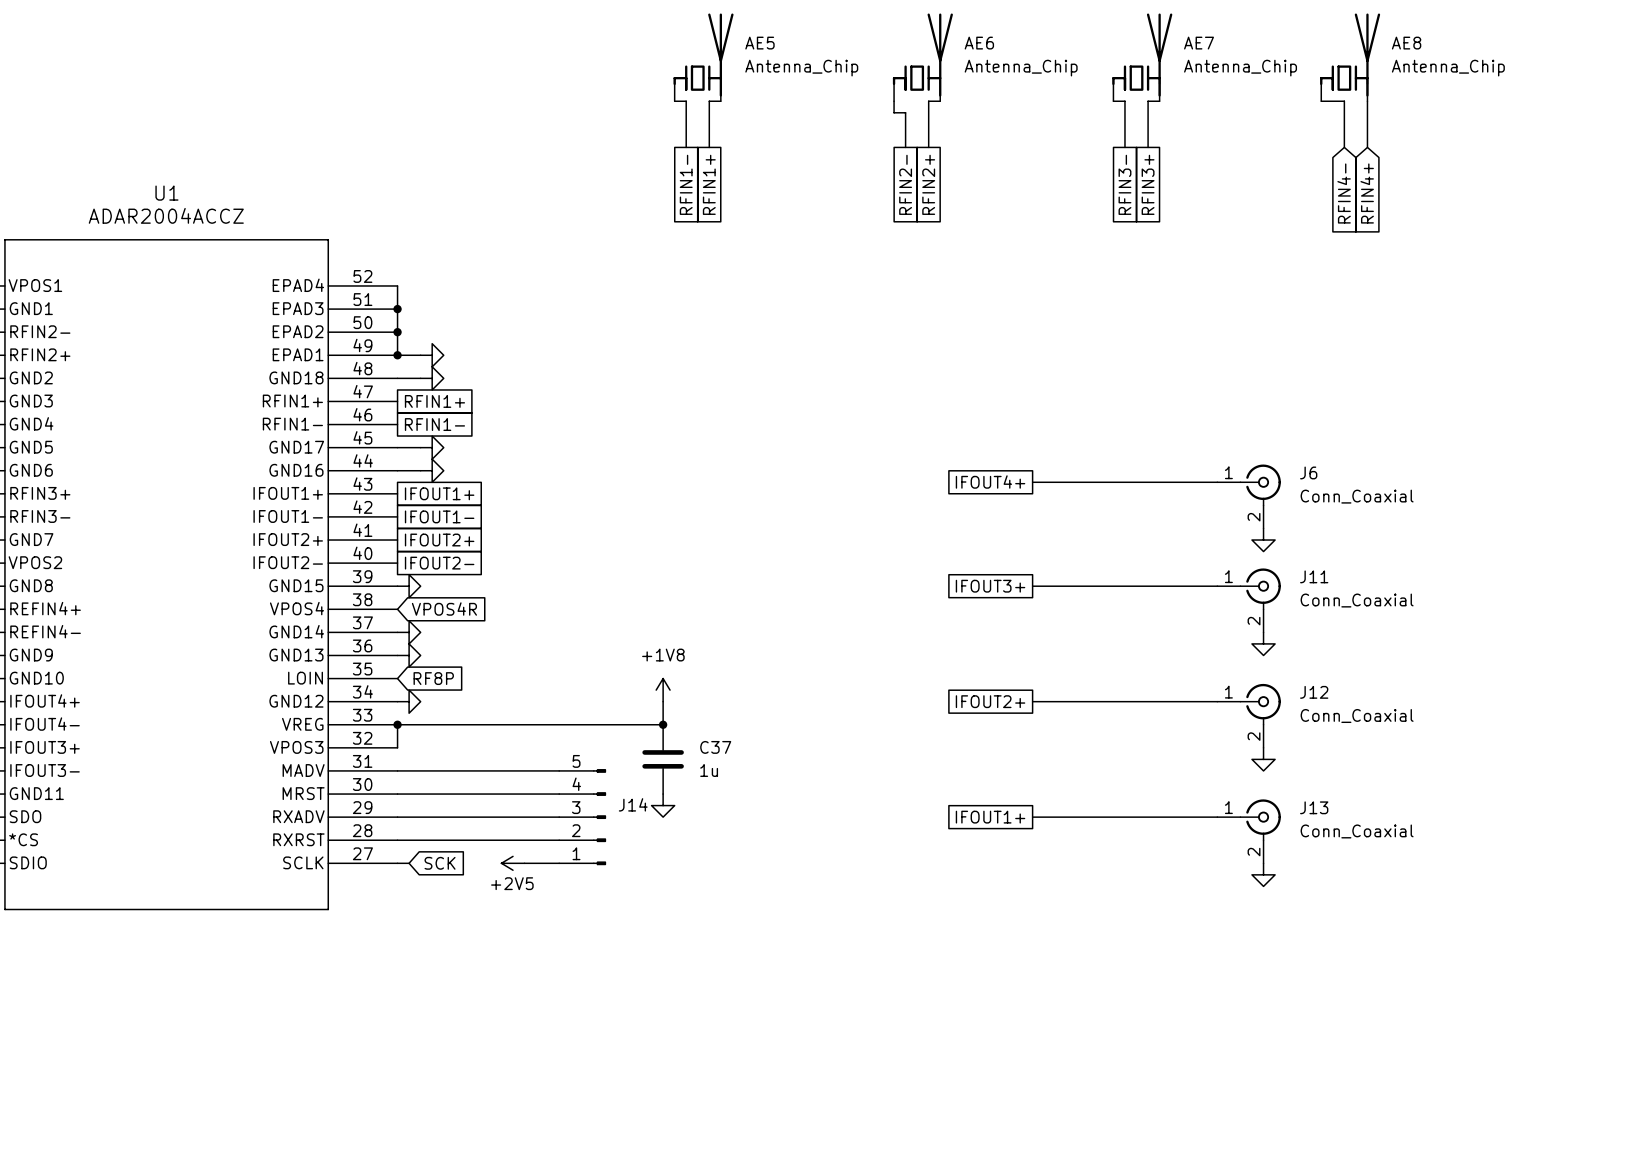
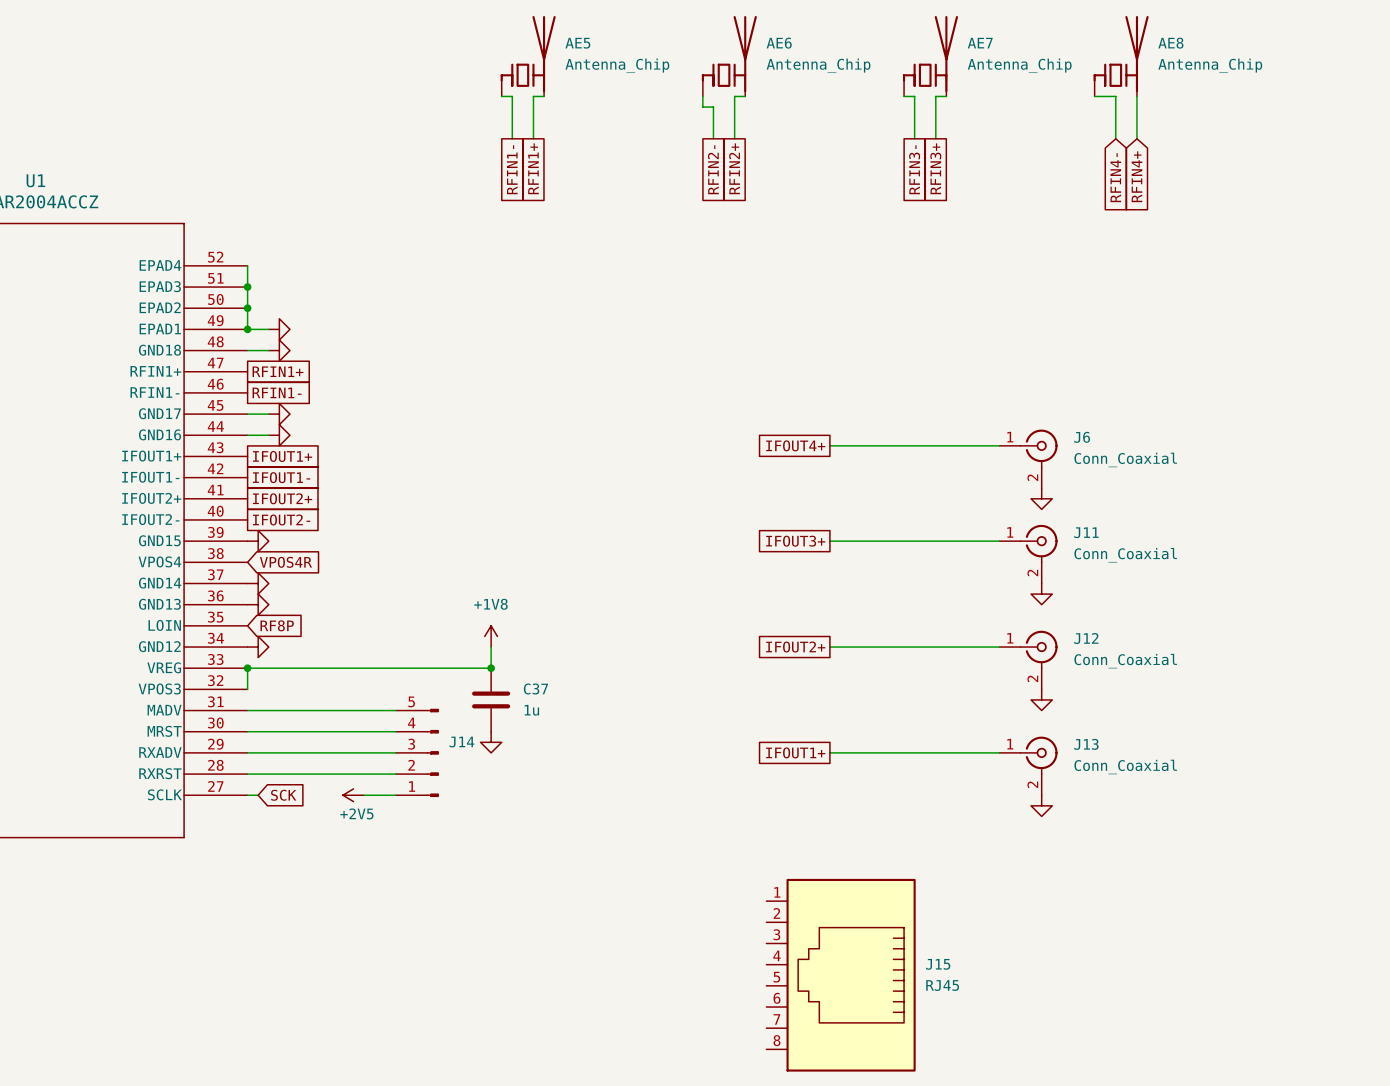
J15: none -> RJ45 (841, 975)

